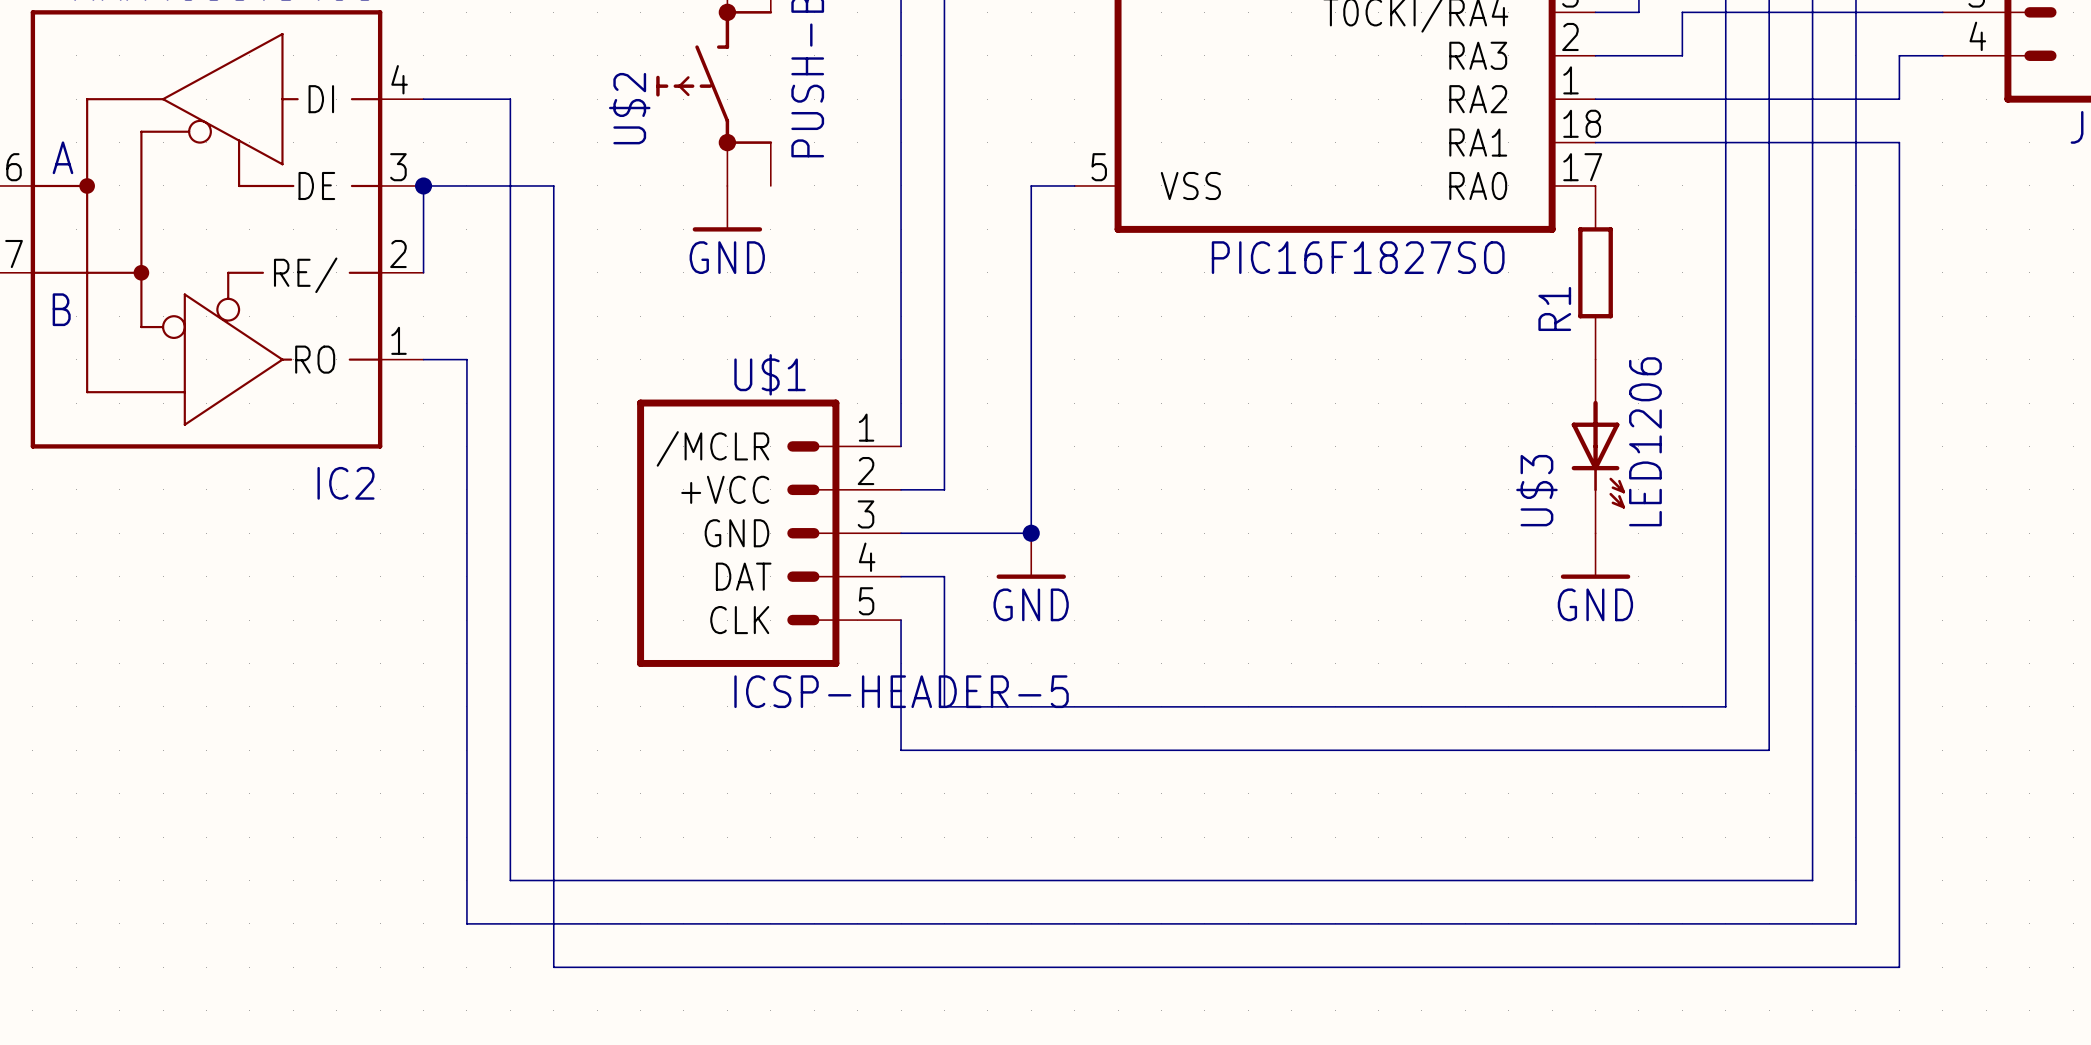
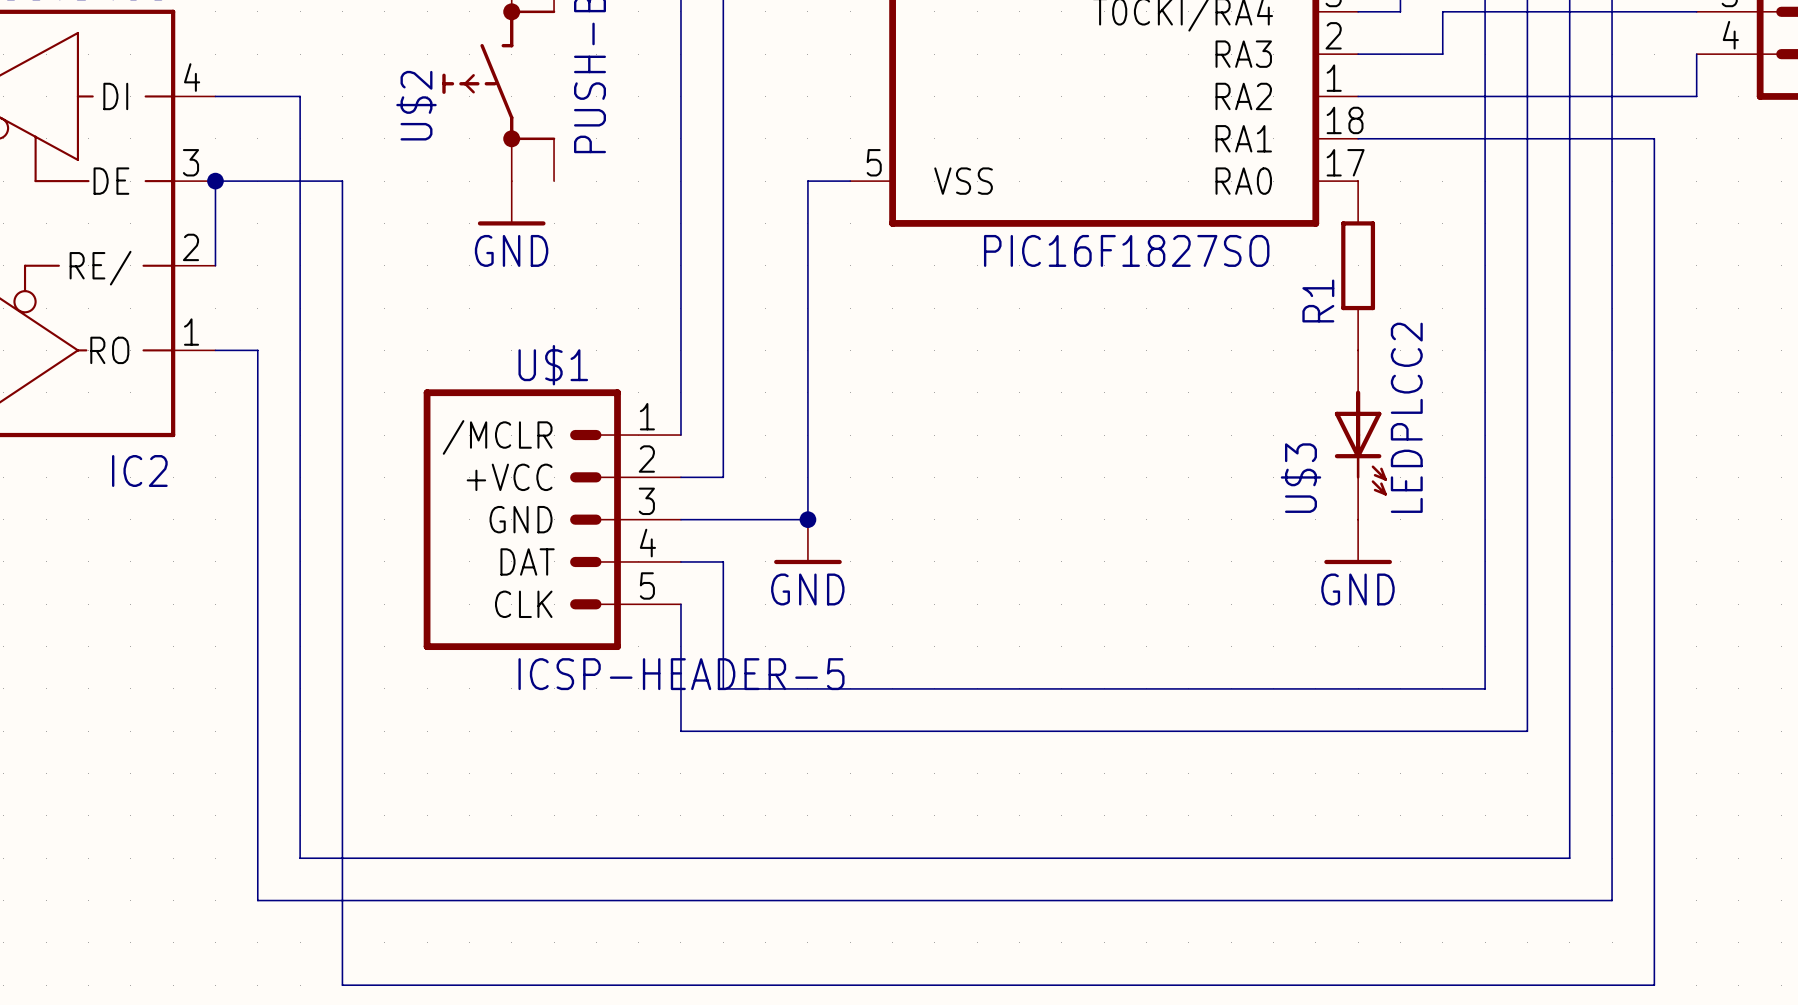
wire: (1942, 55) (1899, 55) (1899, 99) -> (1696, 54) (1696, 96) (1654, 96)
U$3 value: LED1206 (1645, 441) -> LEDPLCC2 (1406, 417)
wire: (553, 967) (1899, 967) -> (342, 942) (342, 985) (1654, 985) (1654, 942)

